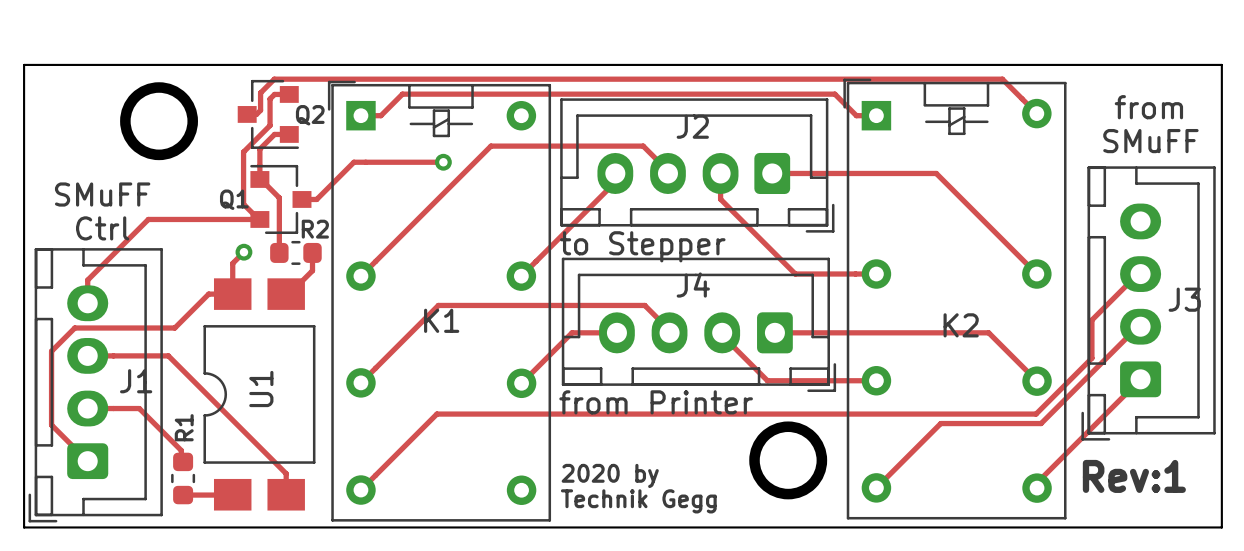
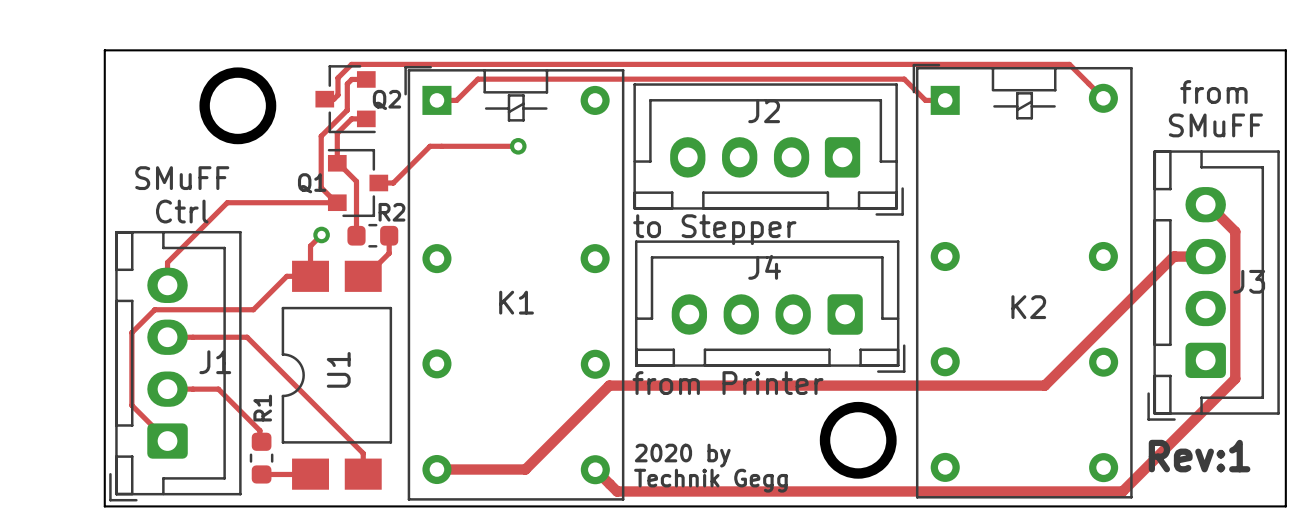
track: (615, 173) (615, 182) (521, 276) -> none
track: (667, 173) (667, 170) (643, 146) (490, 146) (360, 276) -> none
track: (720, 173) (720, 199) (795, 274) (876, 274) -> none
track: (772, 173) (936, 173) (1036, 274) -> none
track: none -> (1205, 204) (1208, 204) (1235, 231) (1235, 378) (1122, 491) (617, 491) (595, 469)
track: (1137, 274) (1091, 320) (1091, 358) (1036, 414) (436, 414) (360, 490) -> (1203, 256) (1173, 256) (1044, 385) (609, 385) (525, 469) (436, 469)
track: (1140, 326) (1137, 326) (1041, 423) (940, 423) (876, 487) -> none
track: (616, 332) (572, 332) (521, 383) -> none
track: (669, 332) (669, 330) (644, 305) (438, 305) (360, 382) -> none
track: (722, 332) (722, 335) (767, 380) (876, 380) -> none
track: (774, 332) (988, 332) (1037, 381) -> none
track: (1140, 379) (1037, 482) (1037, 488) -> none

